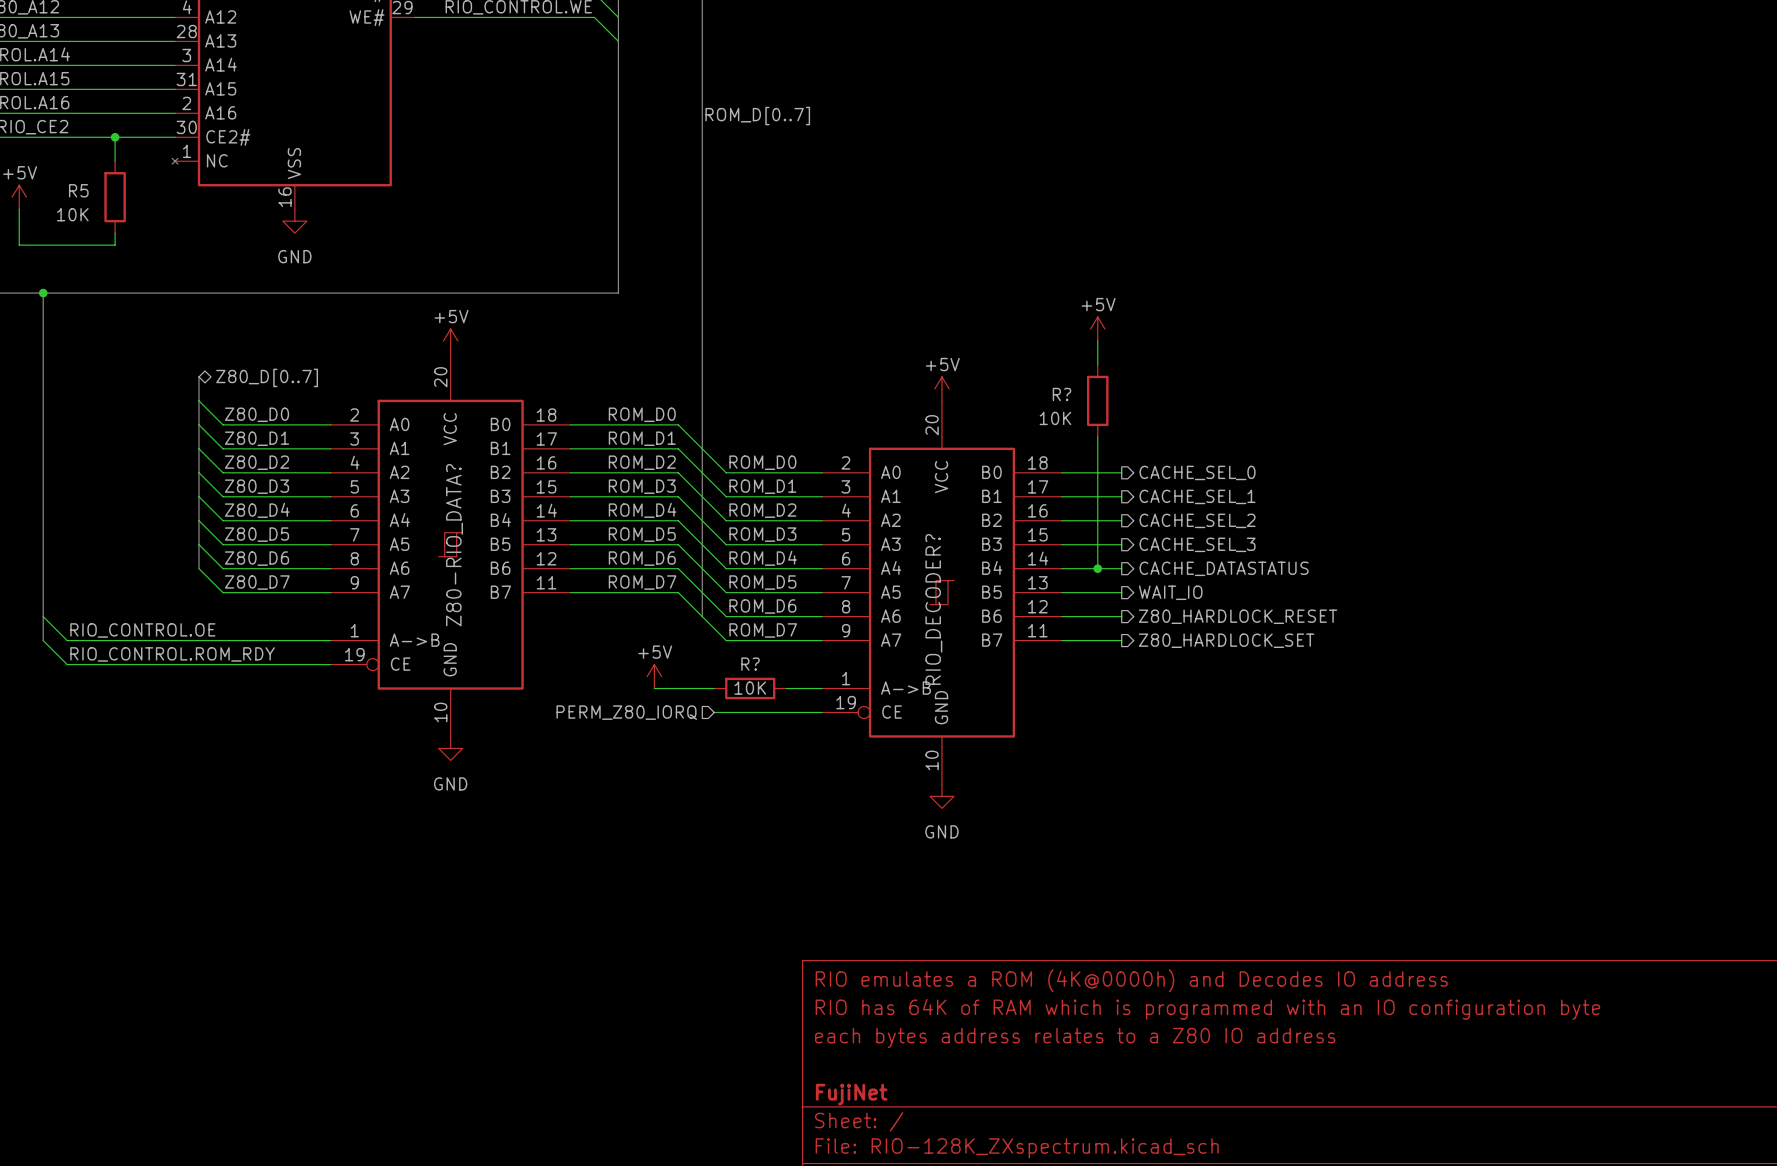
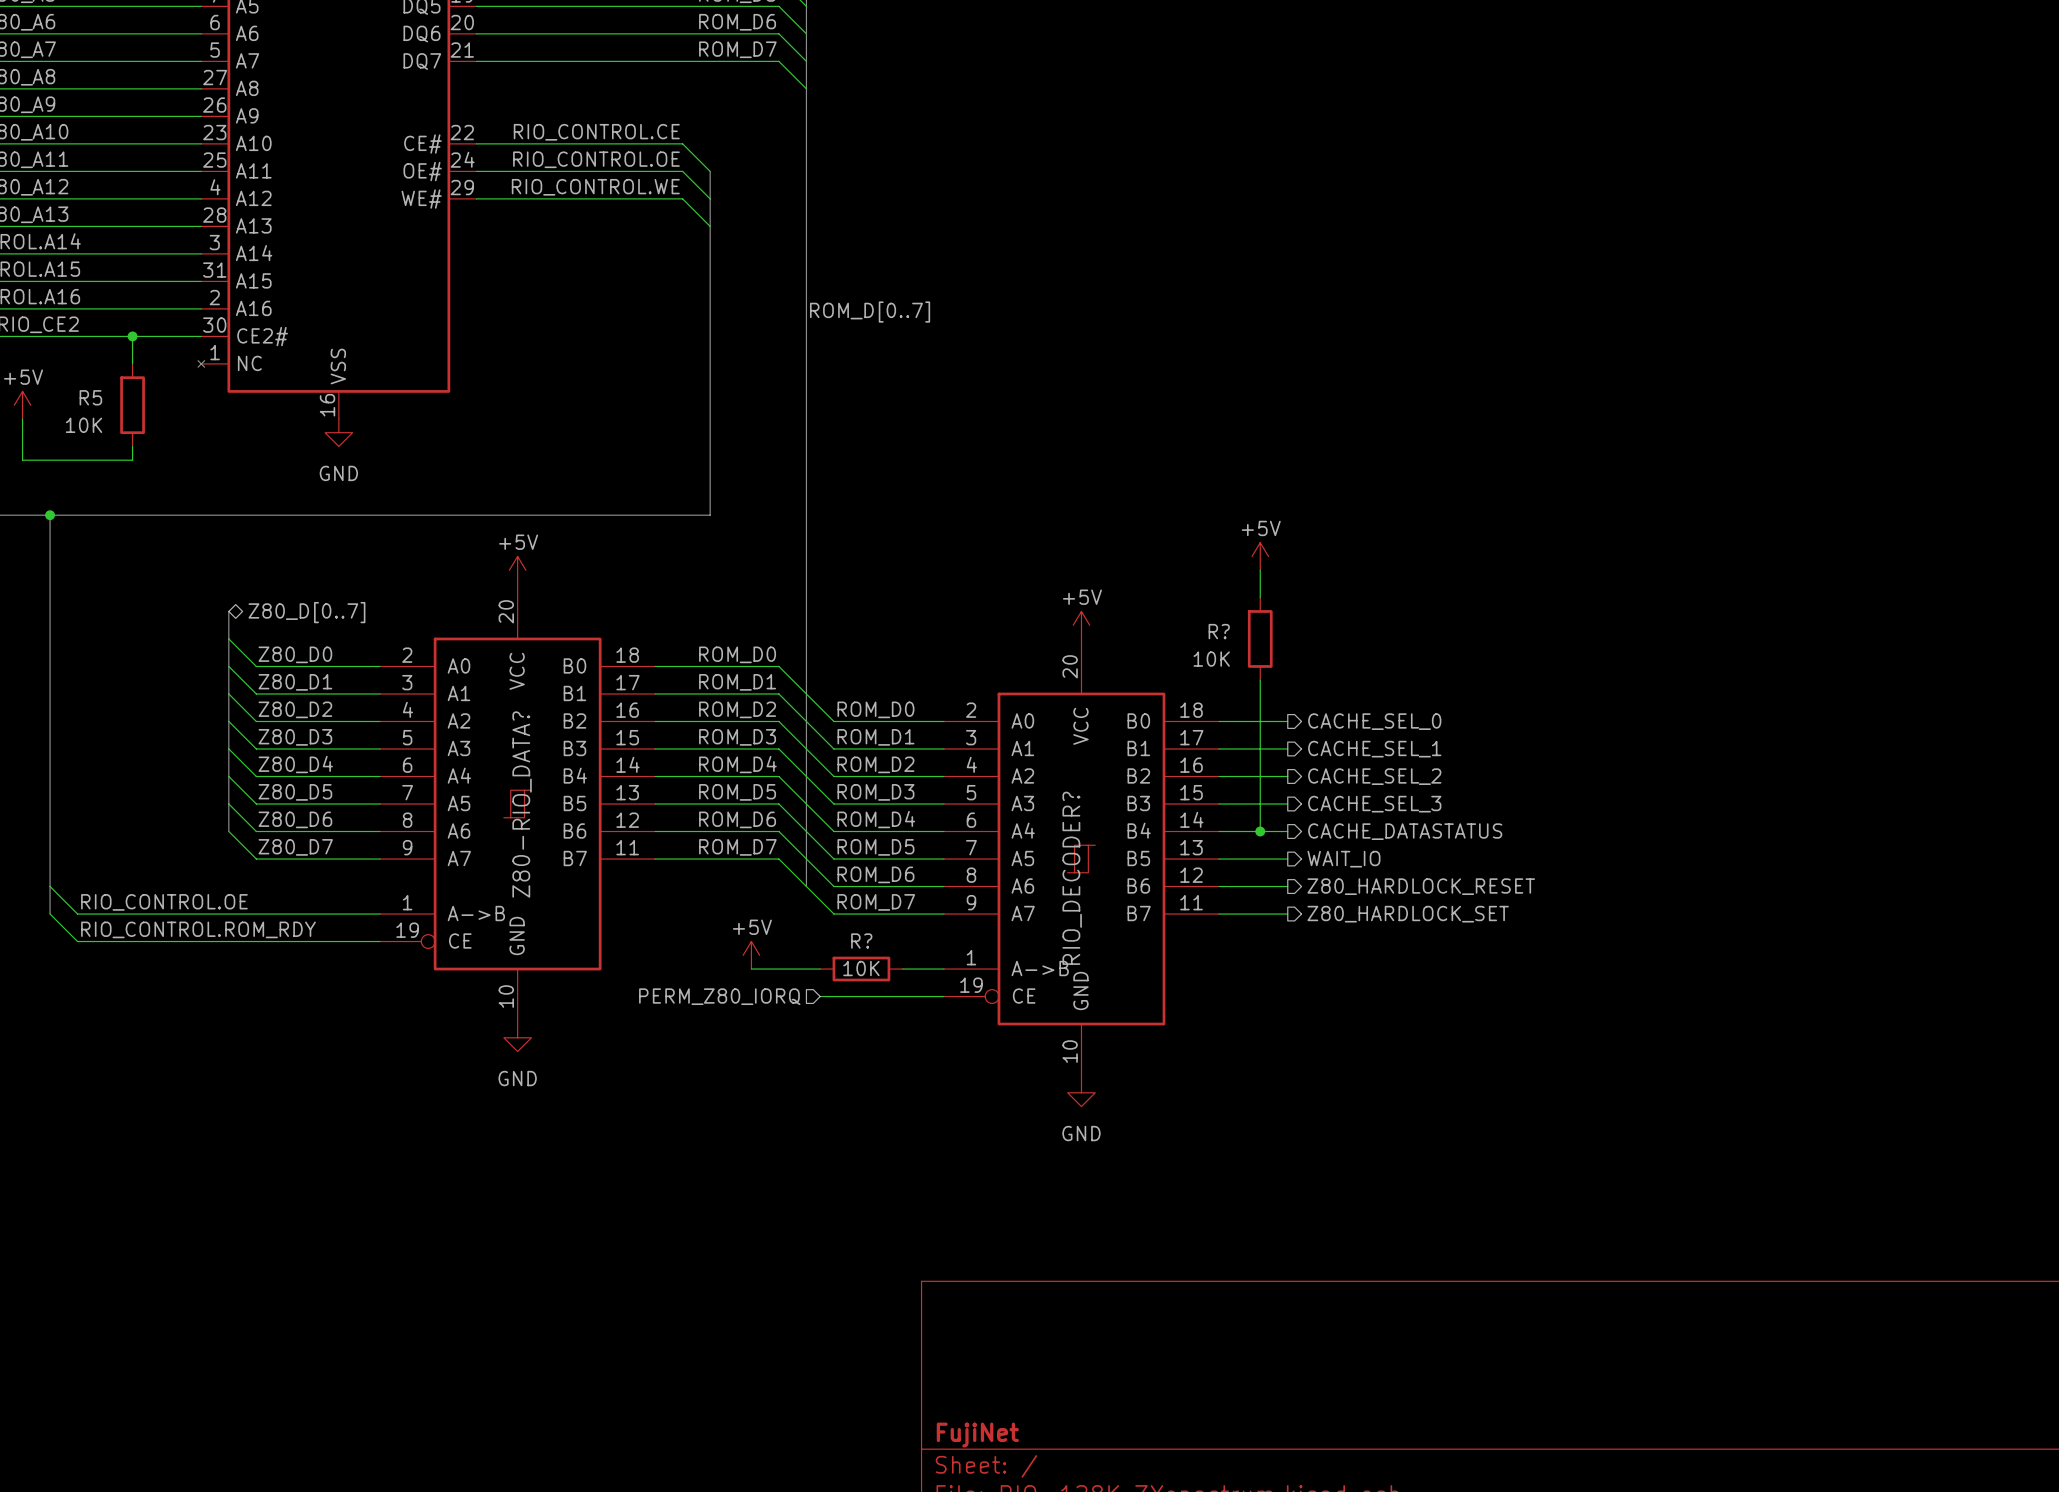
title block: RIO emulates a ROM (4K@0000h) and Decodes IO address (1131, 980) -> none
title block: RIO has 64K of RAM which is programmed with an IO configuration byte (1207, 1009) -> none
title block: each bytes address relates to a Z80 IO address (1075, 1037) -> none

